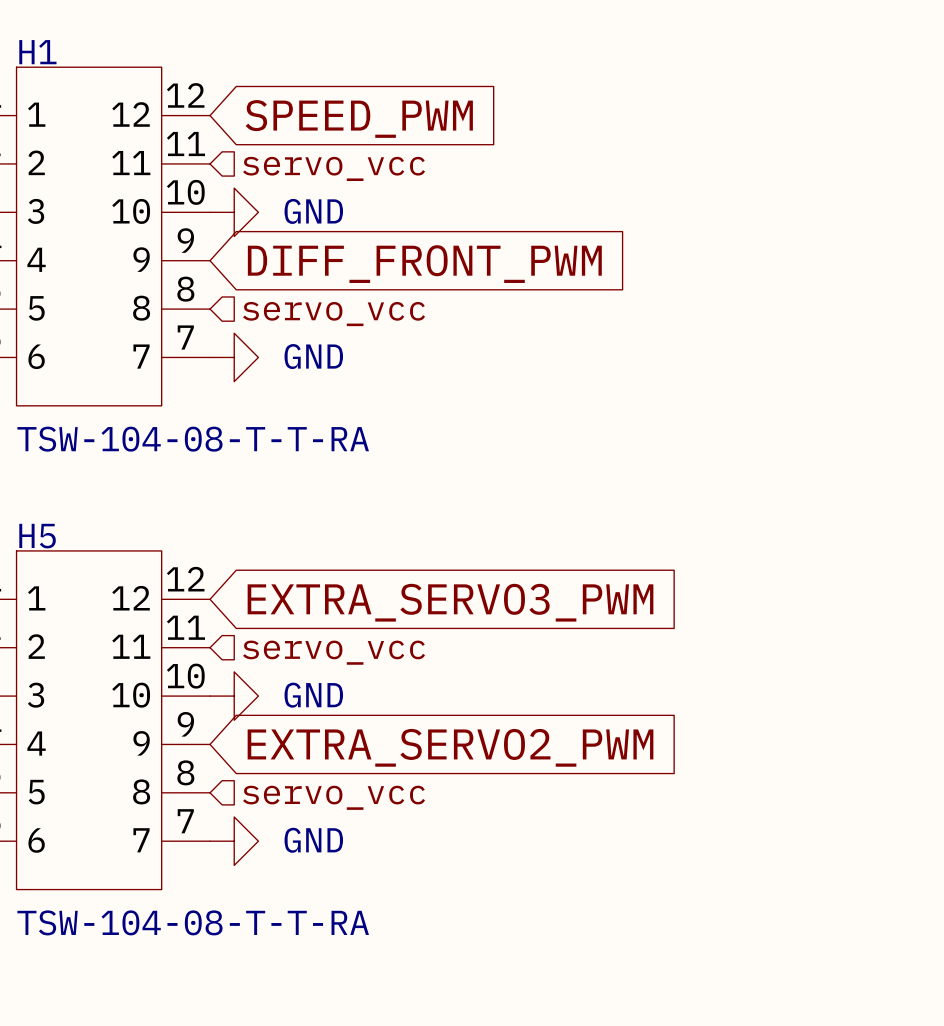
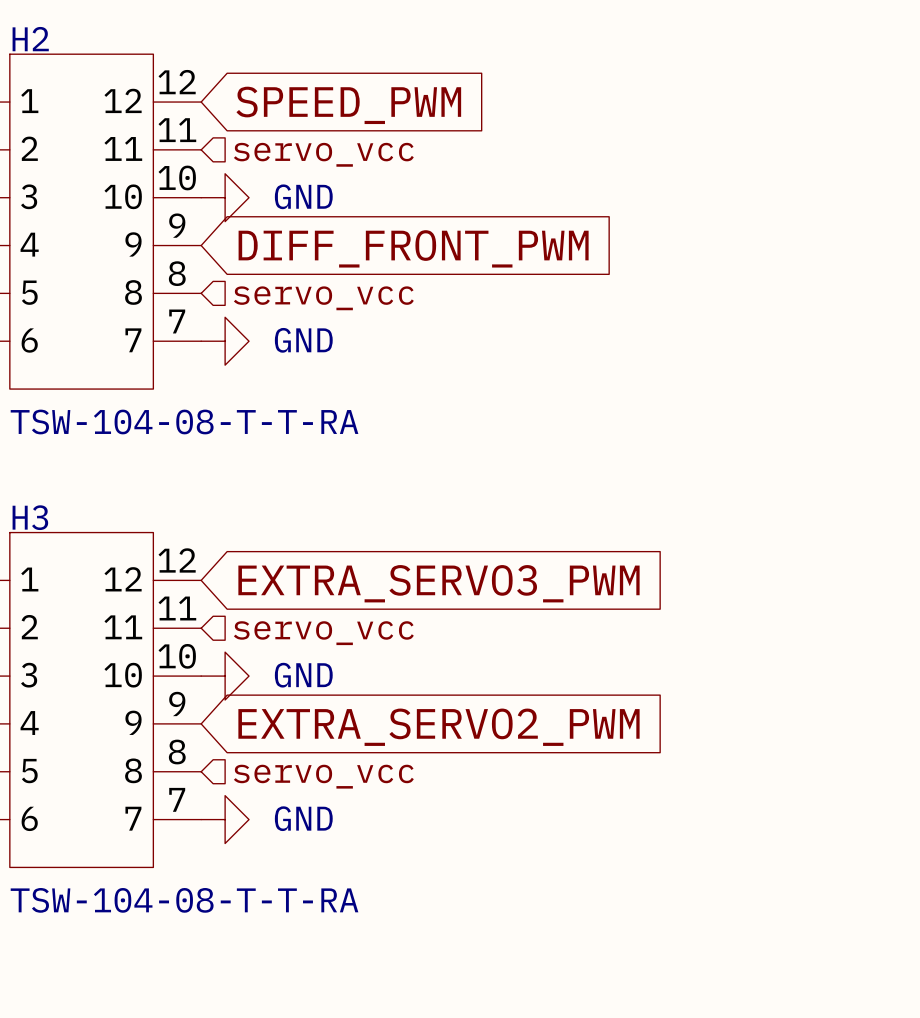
H1 name: H1 (37, 52) -> H2 (30, 39)
H5 name: H5 (37, 536) -> H3 (30, 517)

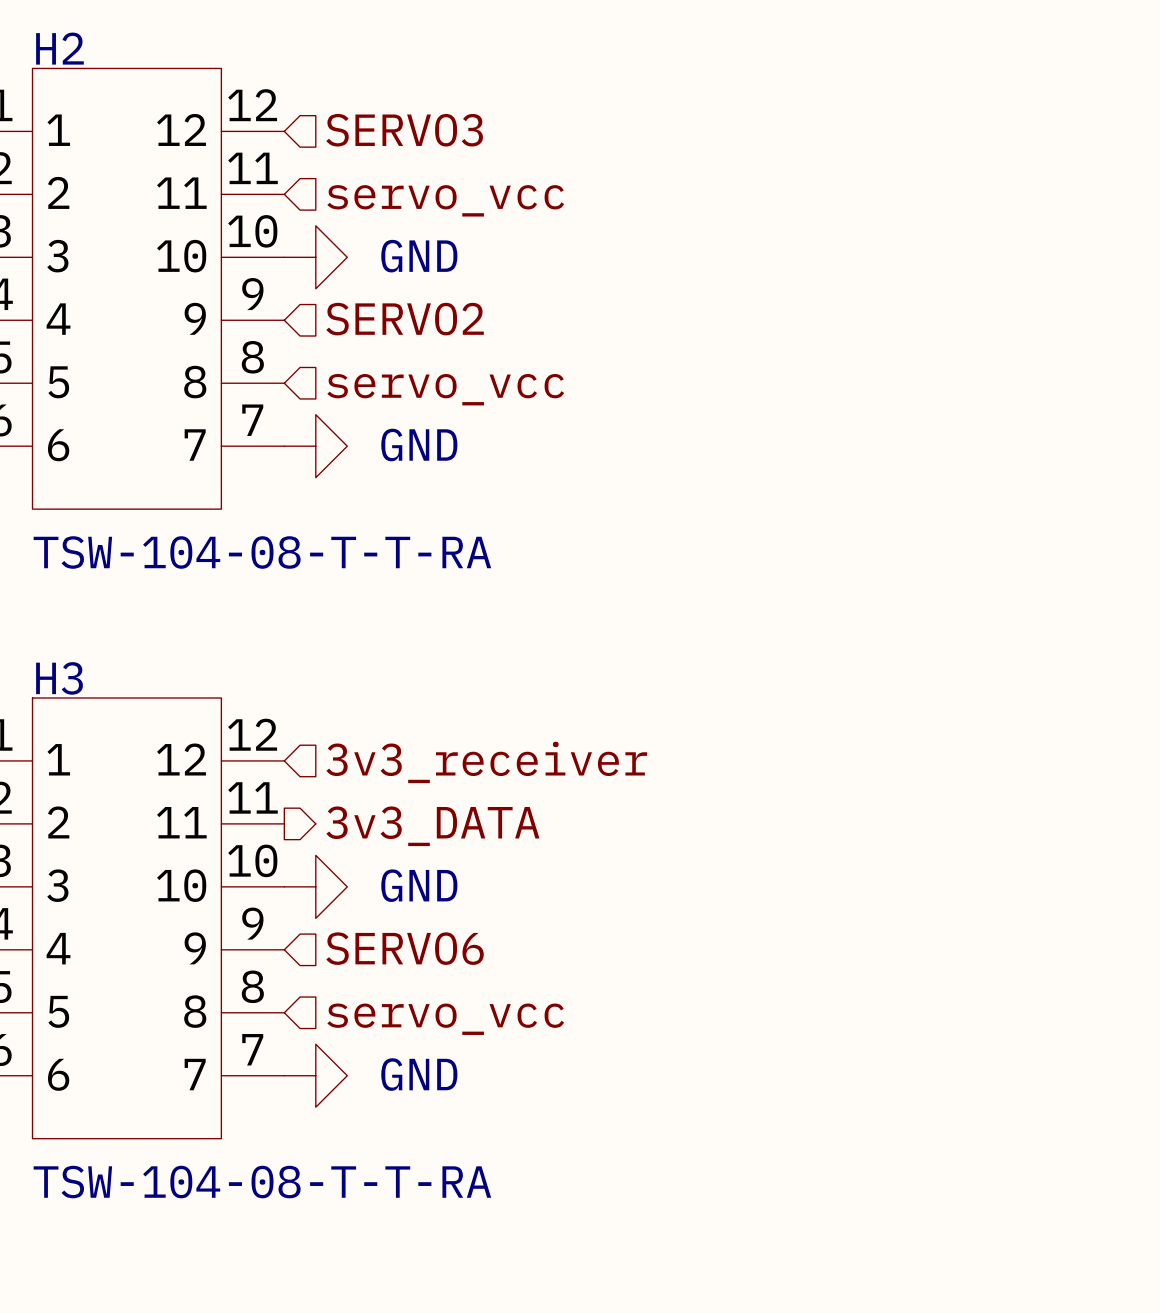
hierarchical label: none -> SERVO3 (404, 130)
global label: SPEED_PWM (348, 105) -> none
hierarchical label: none -> SERVO2 (405, 319)
global label: DIFF_FRONT_PWM (413, 248) -> none
hierarchical label: none -> 3v3_receiver (486, 762)
global label: EXTRA_SERVO3_PWM (438, 583) -> none
hierarchical label shape: input (323, 633) -> output (432, 826)
hierarchical label: servo_vcc (323, 633) -> 3v3_DATA (432, 826)
hierarchical label: none -> SERVO6 (405, 948)
global label: EXTRA_SERVO2_PWM (438, 727) -> none

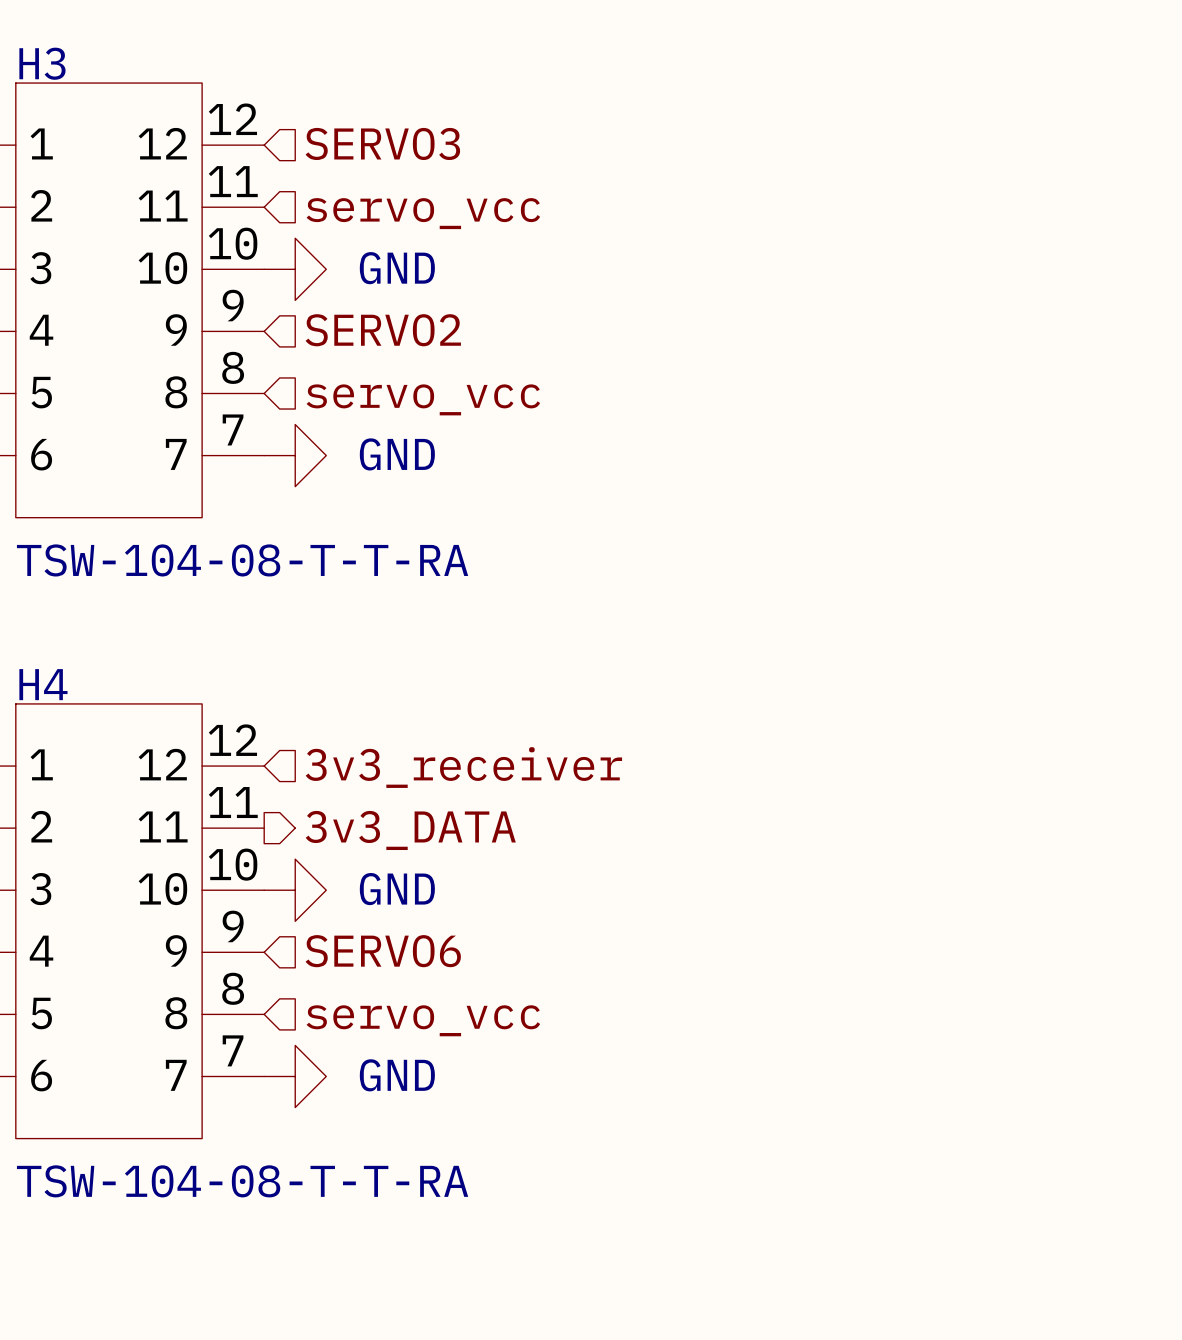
H2 name: H2 (59, 48) -> H3 (42, 63)
H3 name: H3 (59, 678) -> H4 (43, 684)

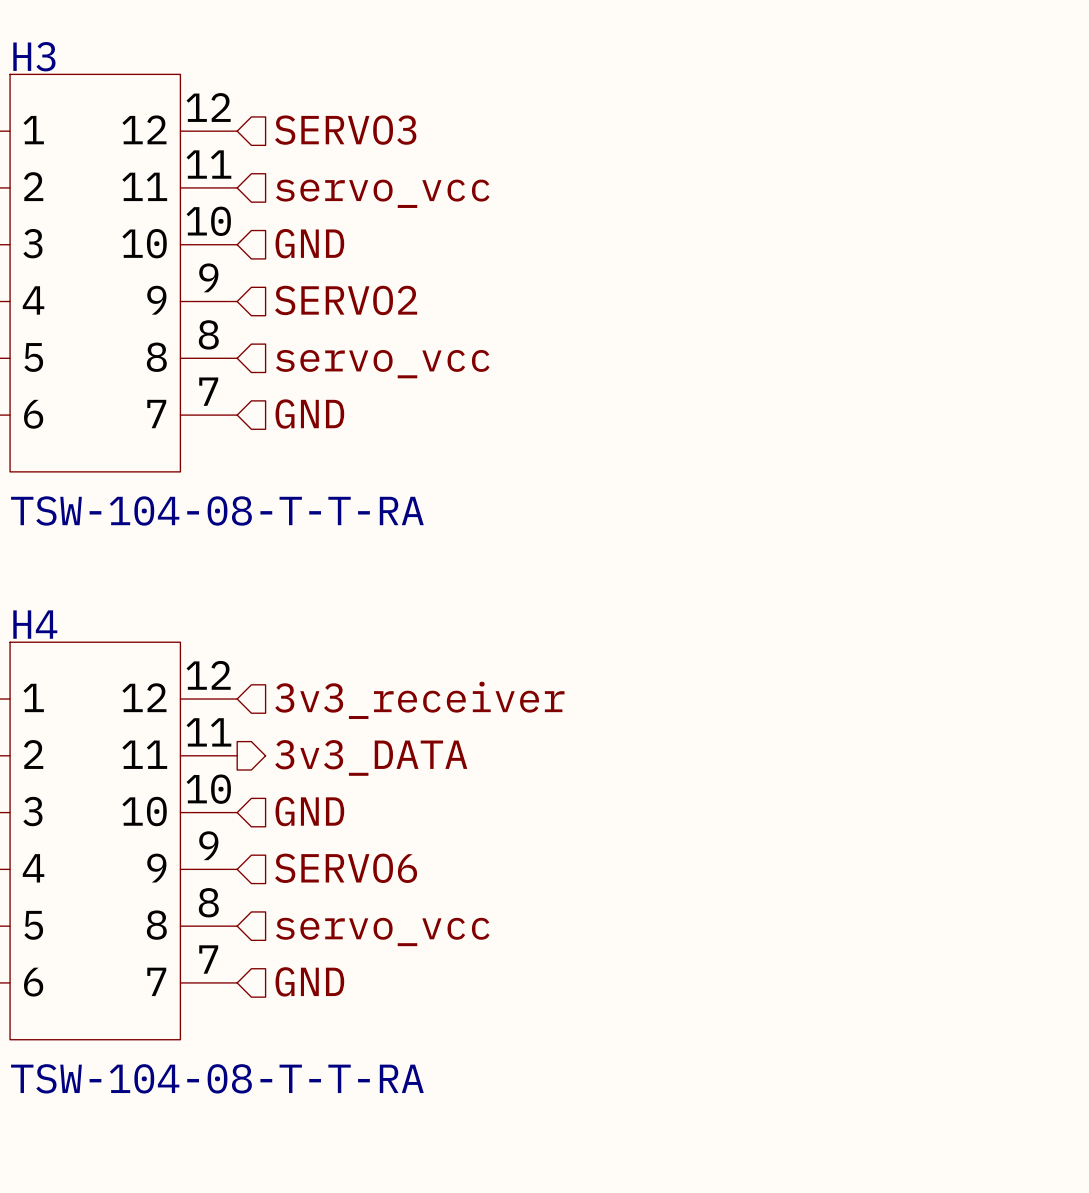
hierarchical label: none -> GND (309, 243)
power symbol: GND (295, 269) -> none
hierarchical label: none -> GND (309, 414)
power symbol: GND (295, 455) -> none
hierarchical label: none -> GND (309, 811)
power symbol: GND (295, 890) -> none
hierarchical label: none -> GND (309, 981)
power symbol: GND (295, 1076) -> none

